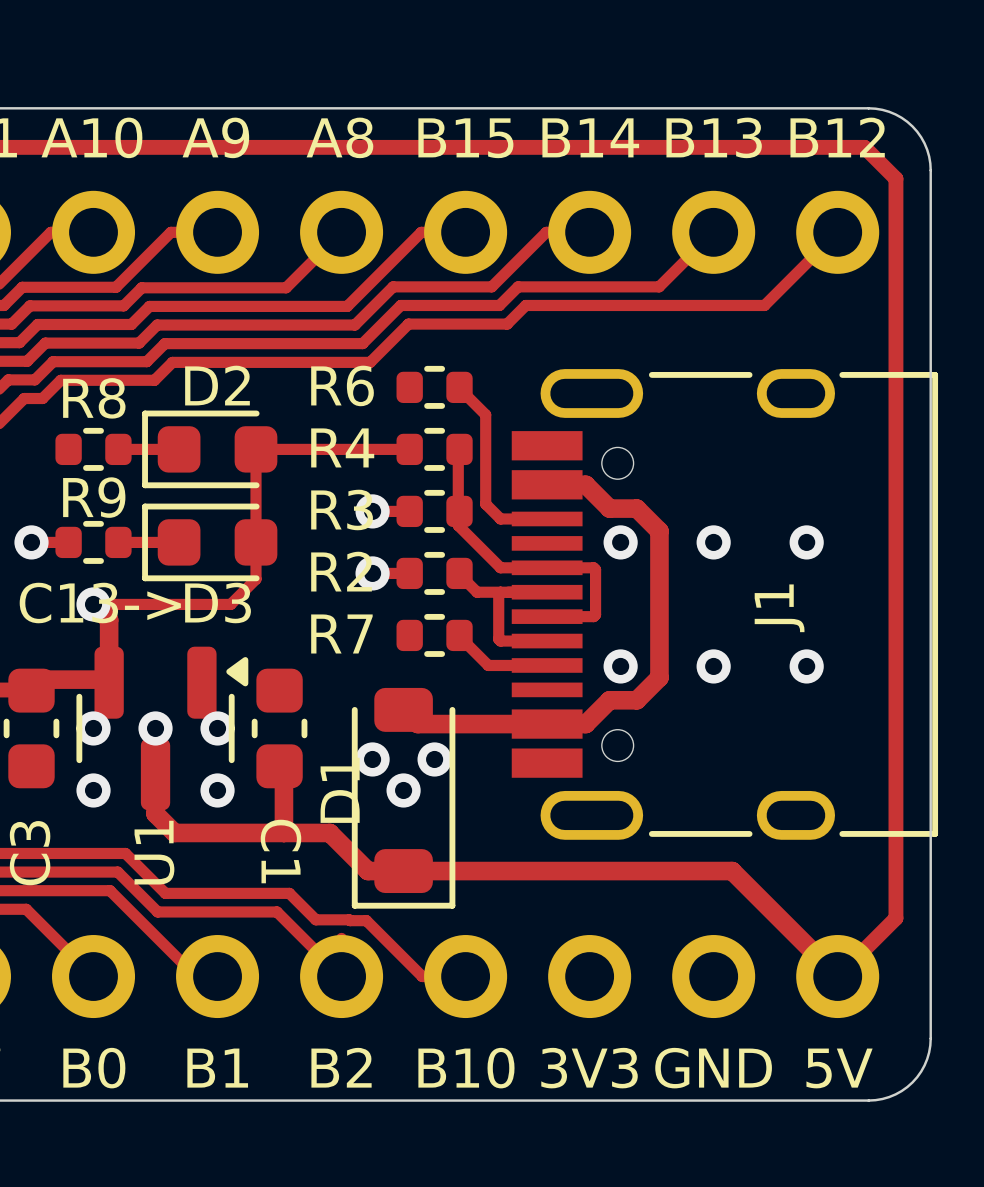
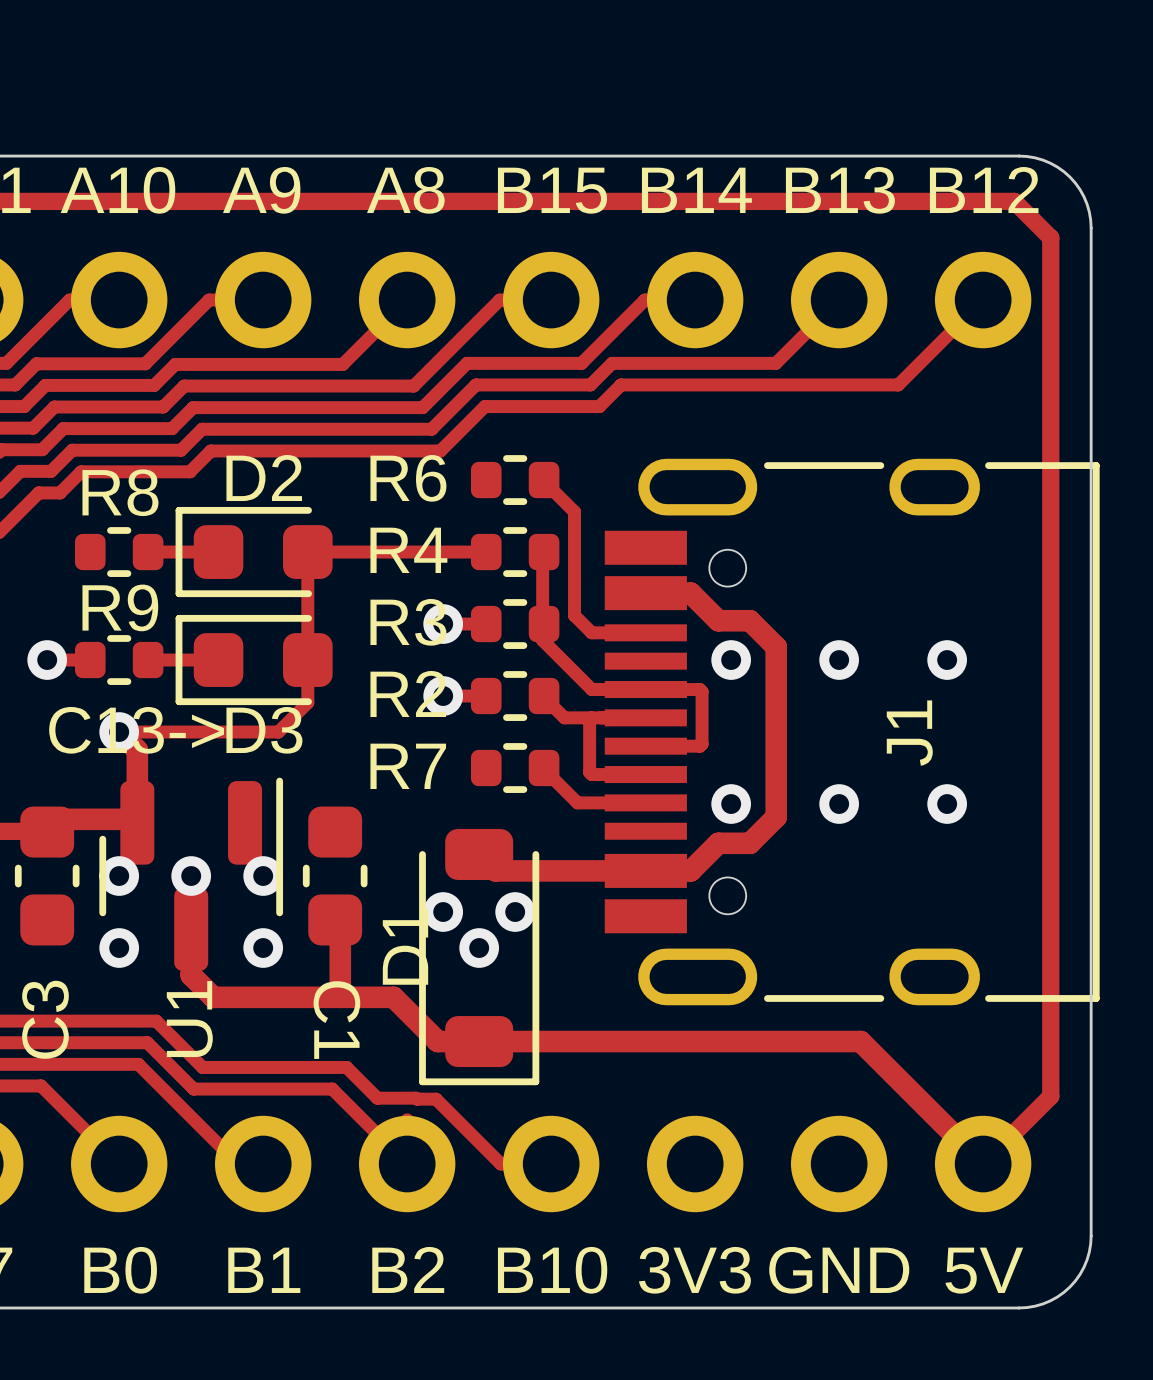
U1 footprint: [76, 646, 249, 811] -> [99, 777, 284, 971]

